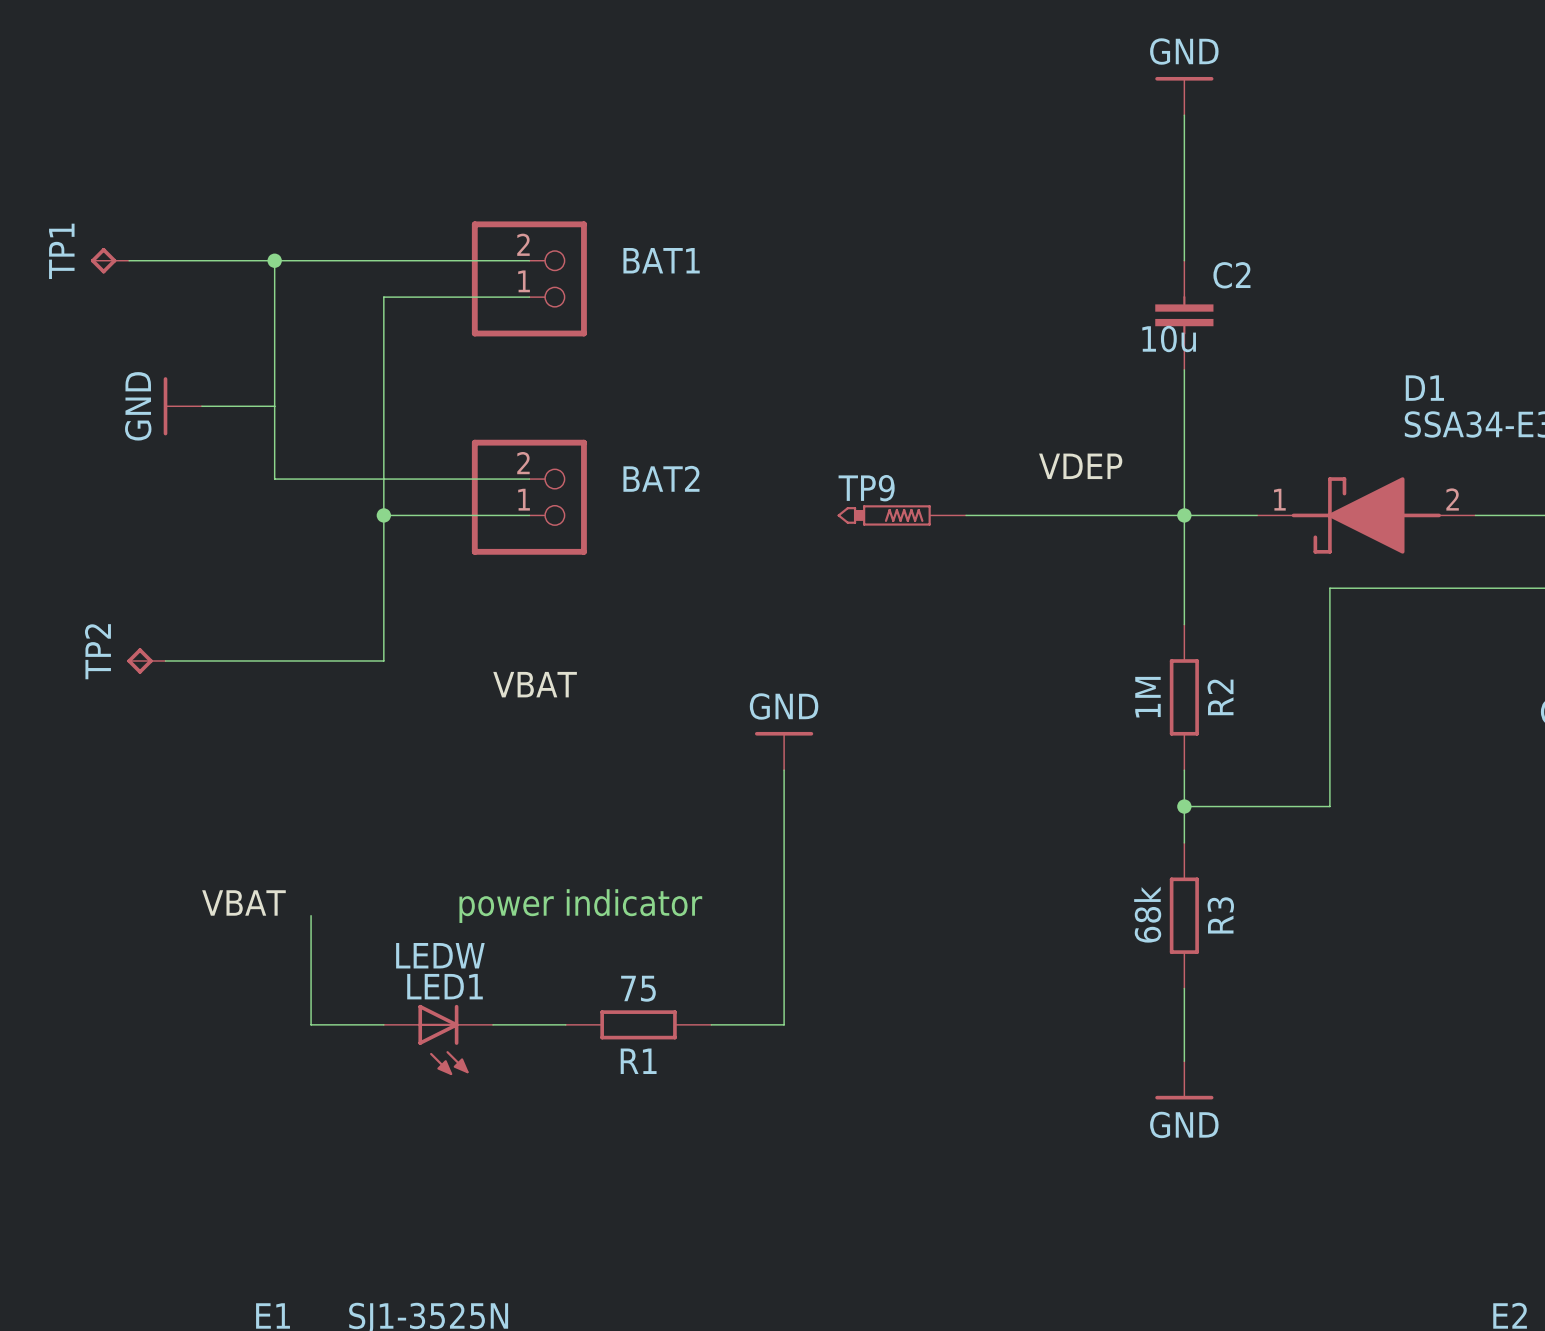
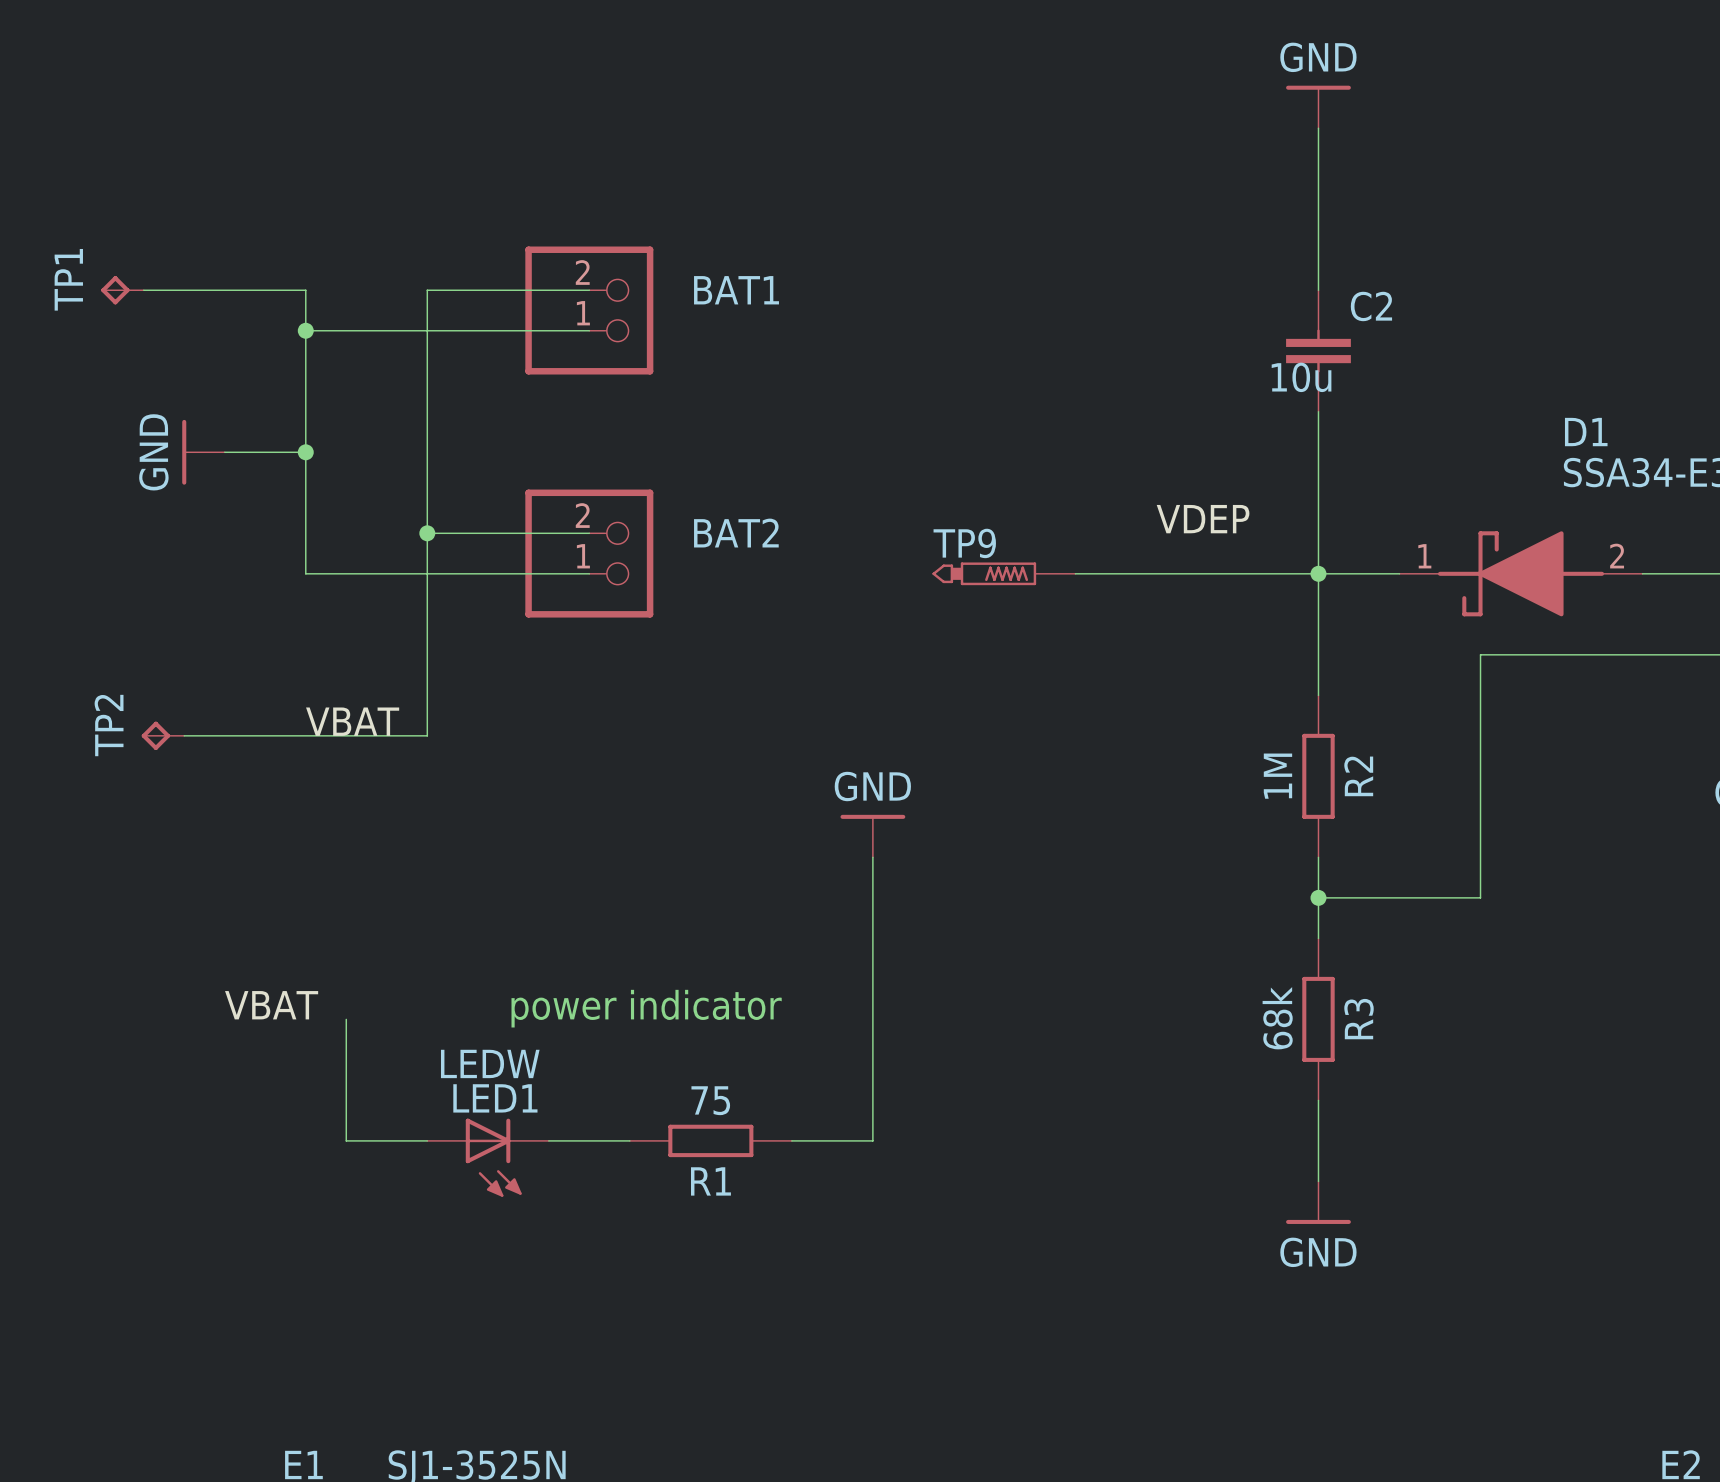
wire: (274, 260) (383, 260) -> (305, 330) (427, 330) (427, 290)
junction position: (274, 260) -> (305, 330)
junction: none -> (305, 452)
wire: (274, 479) (383, 479) -> (305, 533) (305, 573) (427, 573)
junction position: (383, 515) -> (427, 533)
label position: VBAT (535, 684) -> VBAT (352, 721)

